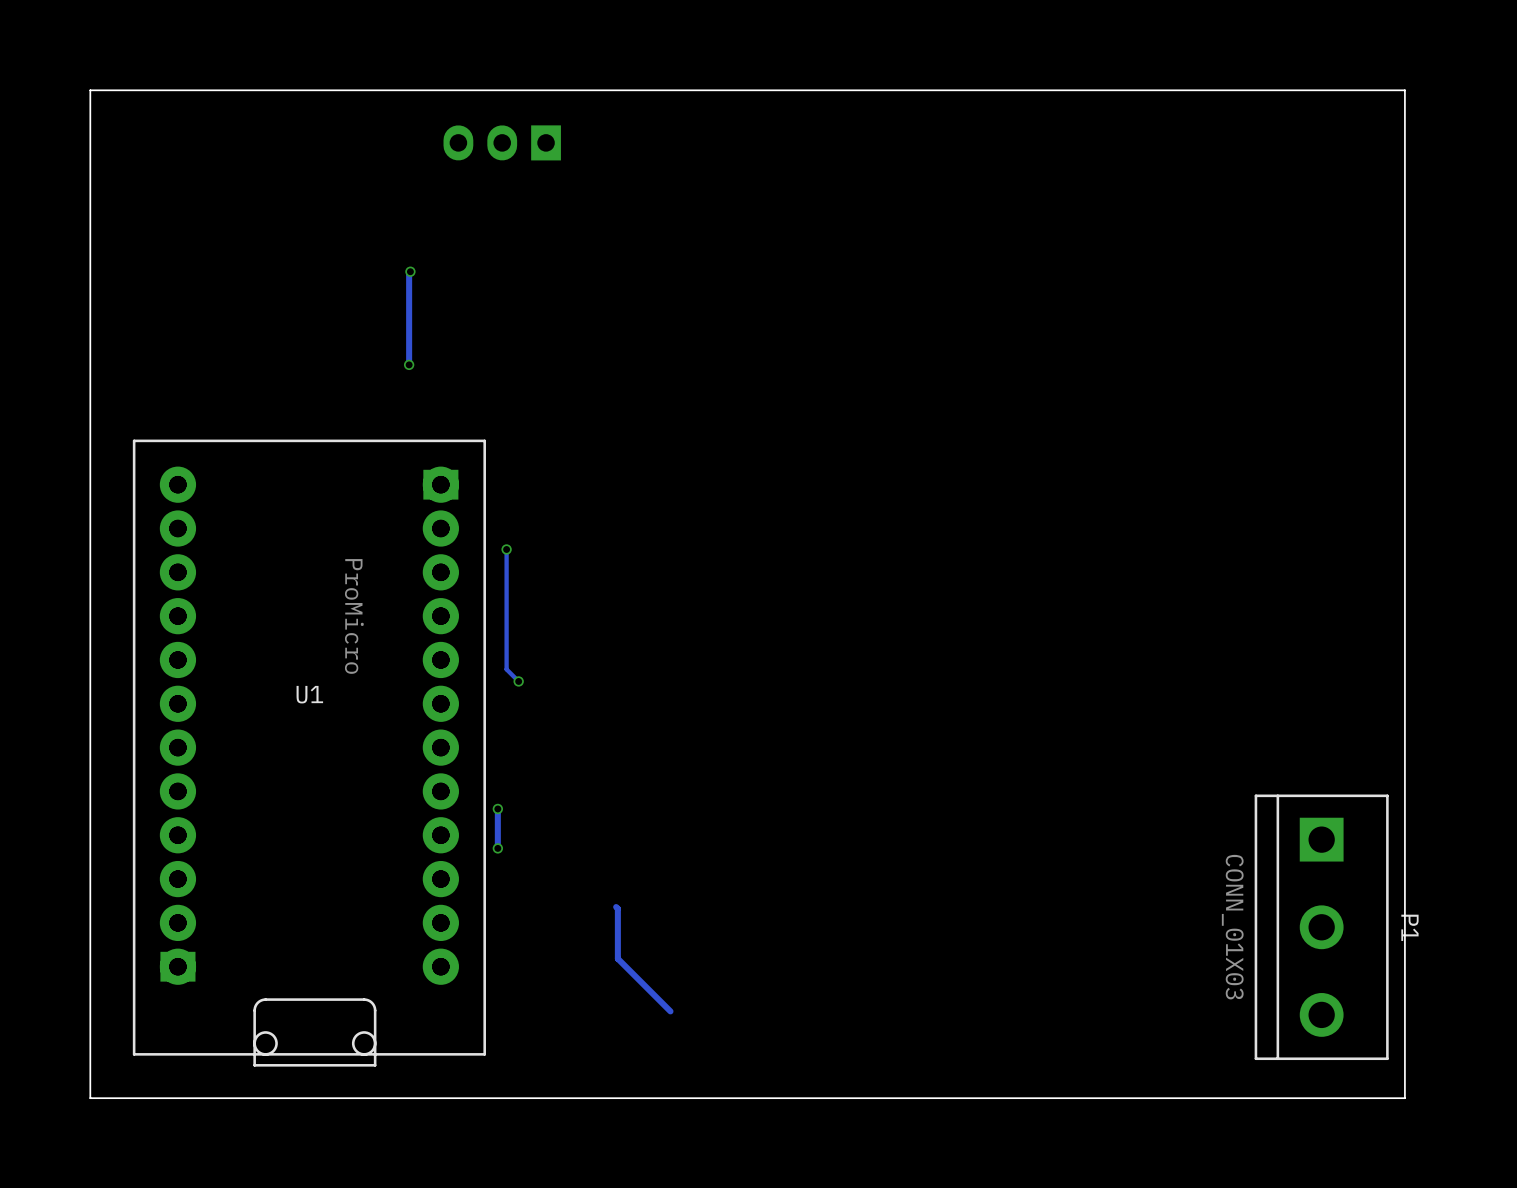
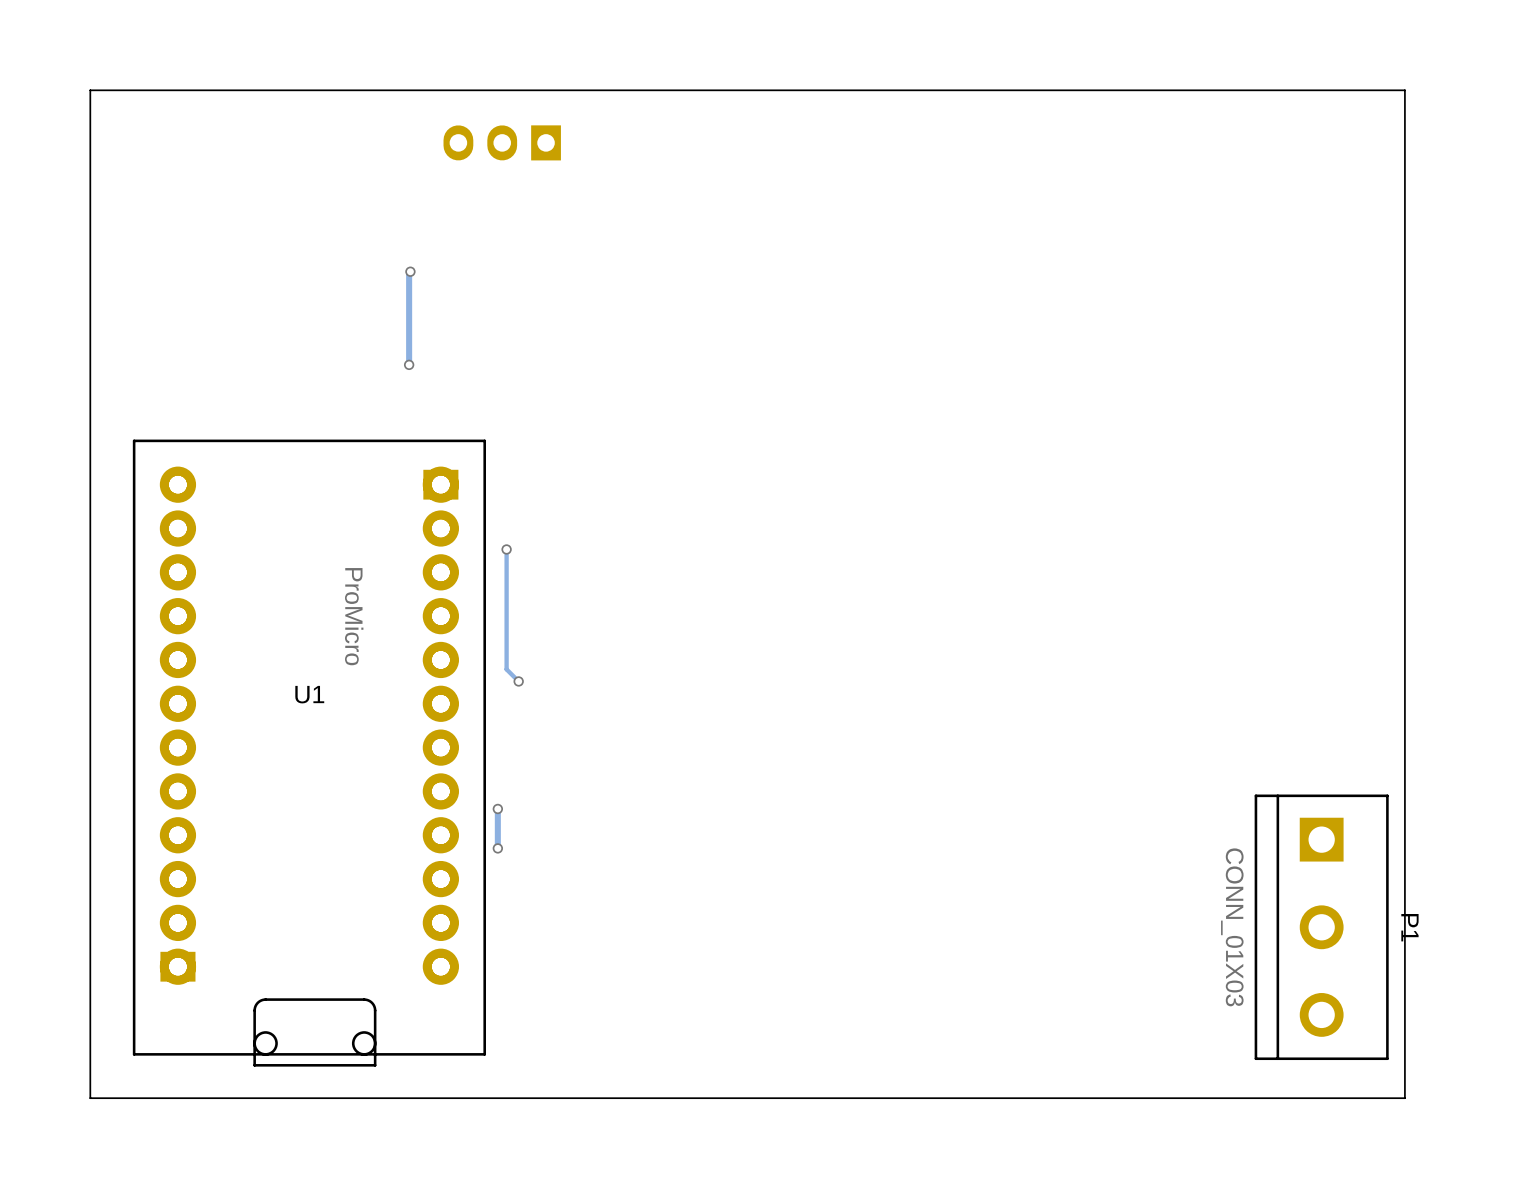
track: (616, 907) (617, 908) (617, 958) (670, 1011) -> none

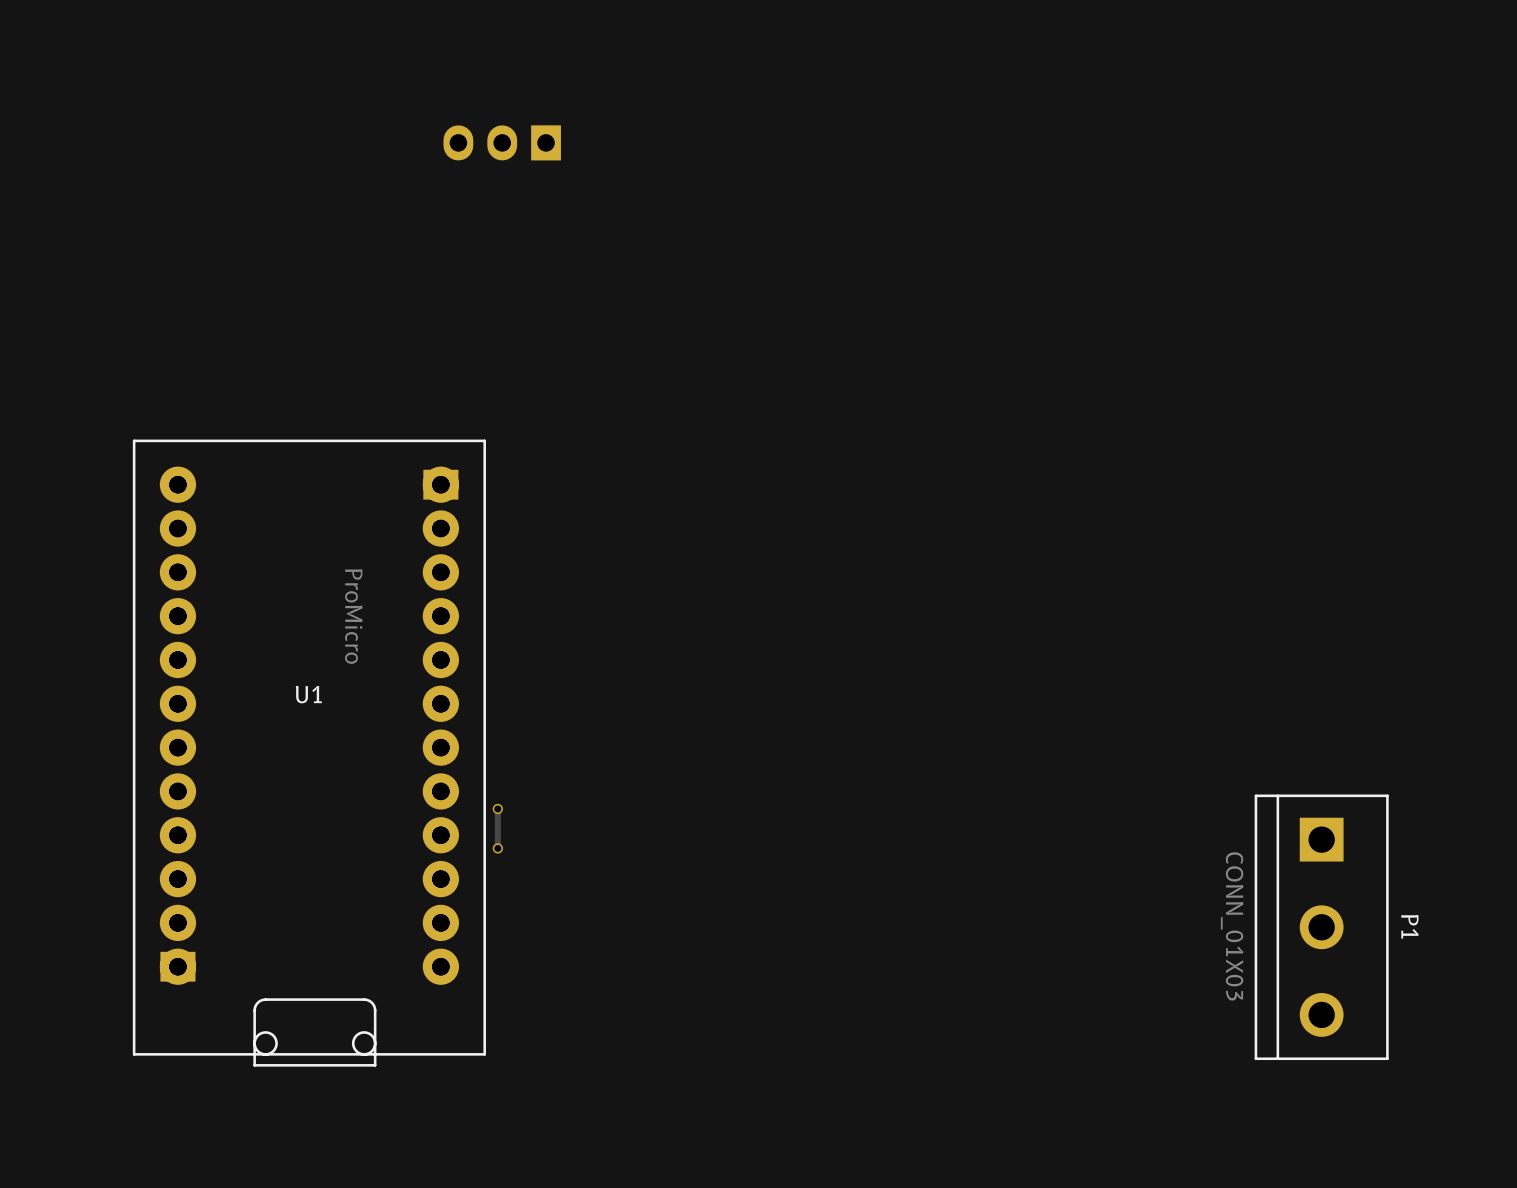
board edge: (1404, 90) (1404, 1098) (90, 1098) (90, 90) (1404, 90) -> none
track: (410, 271) (409, 364) -> none
via: (410, 271) -> none
via: (409, 364) -> none
track: (506, 549) (506, 669) (518, 681) -> none
via: (506, 549) -> none
via: (518, 681) -> none

